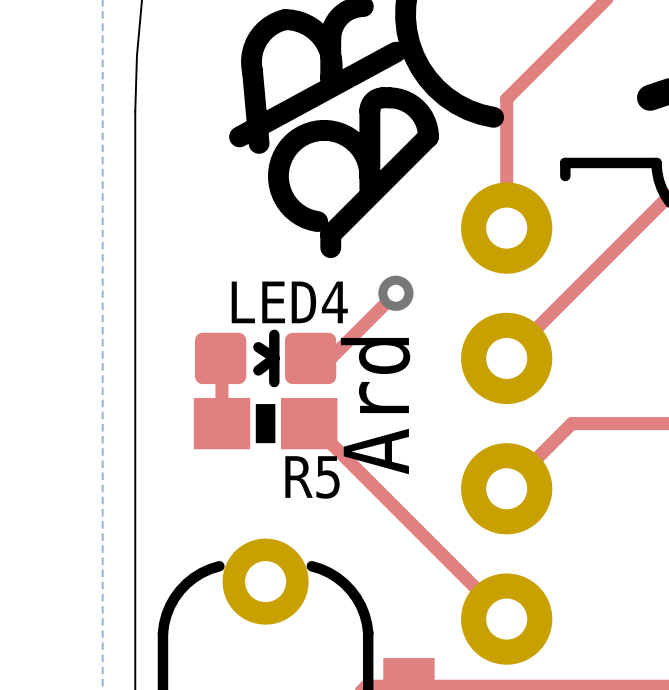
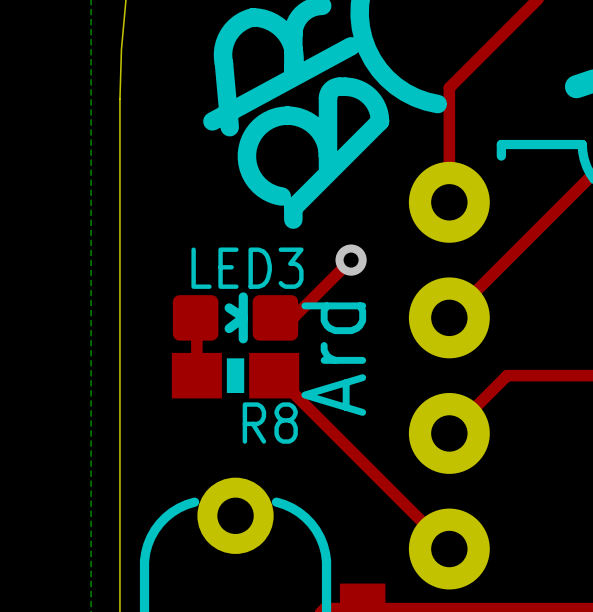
LED4 name: LED4 (289, 302) -> LED3 (247, 268)
R5 name: R5 (312, 477) -> R8 (270, 423)

